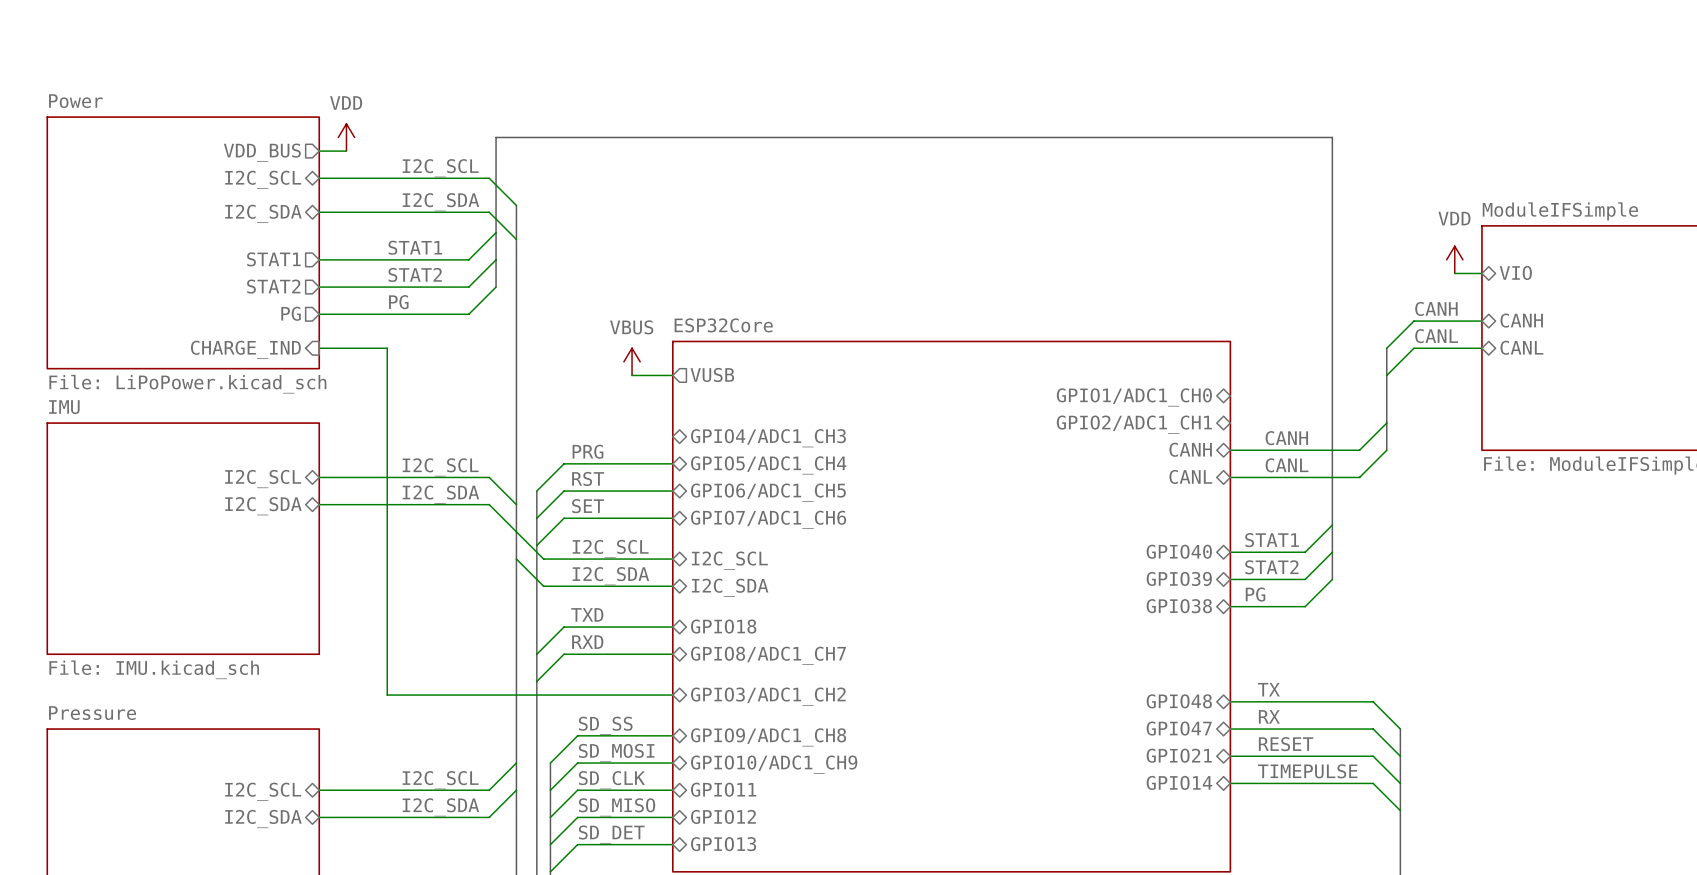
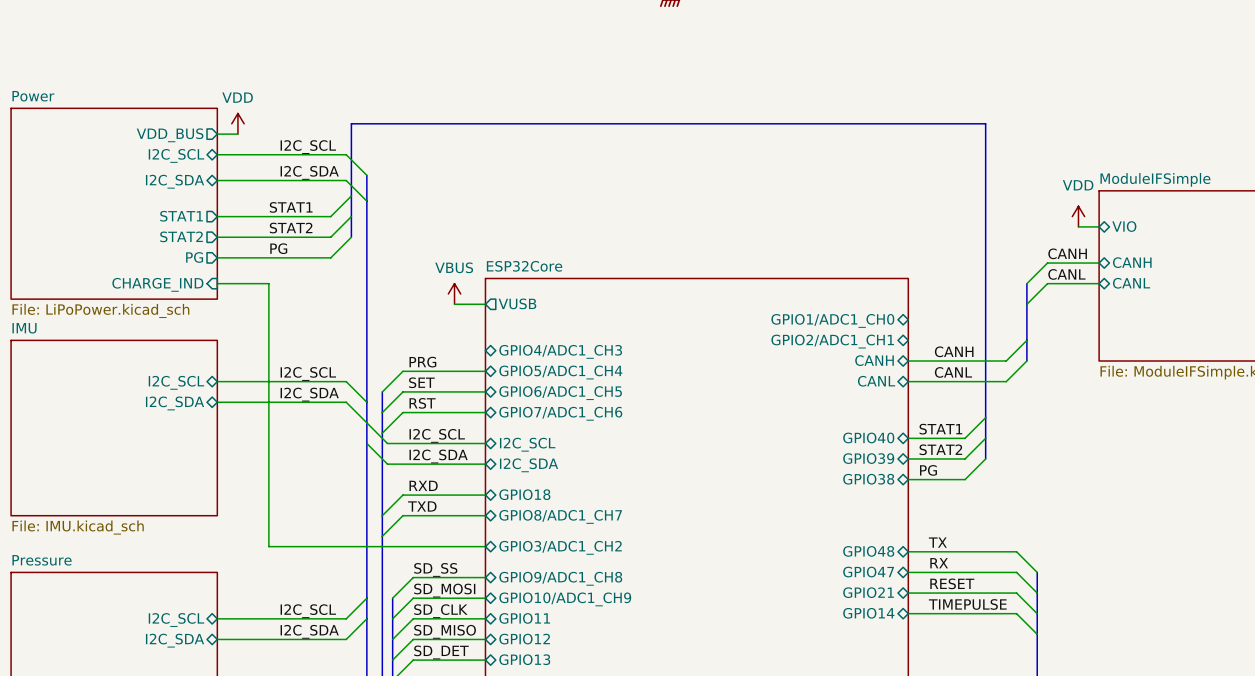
label: RST (588, 478) -> SET (421, 382)
label: SET (588, 506) -> RST (422, 403)
label: TXD (587, 614) -> RXD (423, 485)
label: RXD (587, 642) -> TXD (422, 506)

